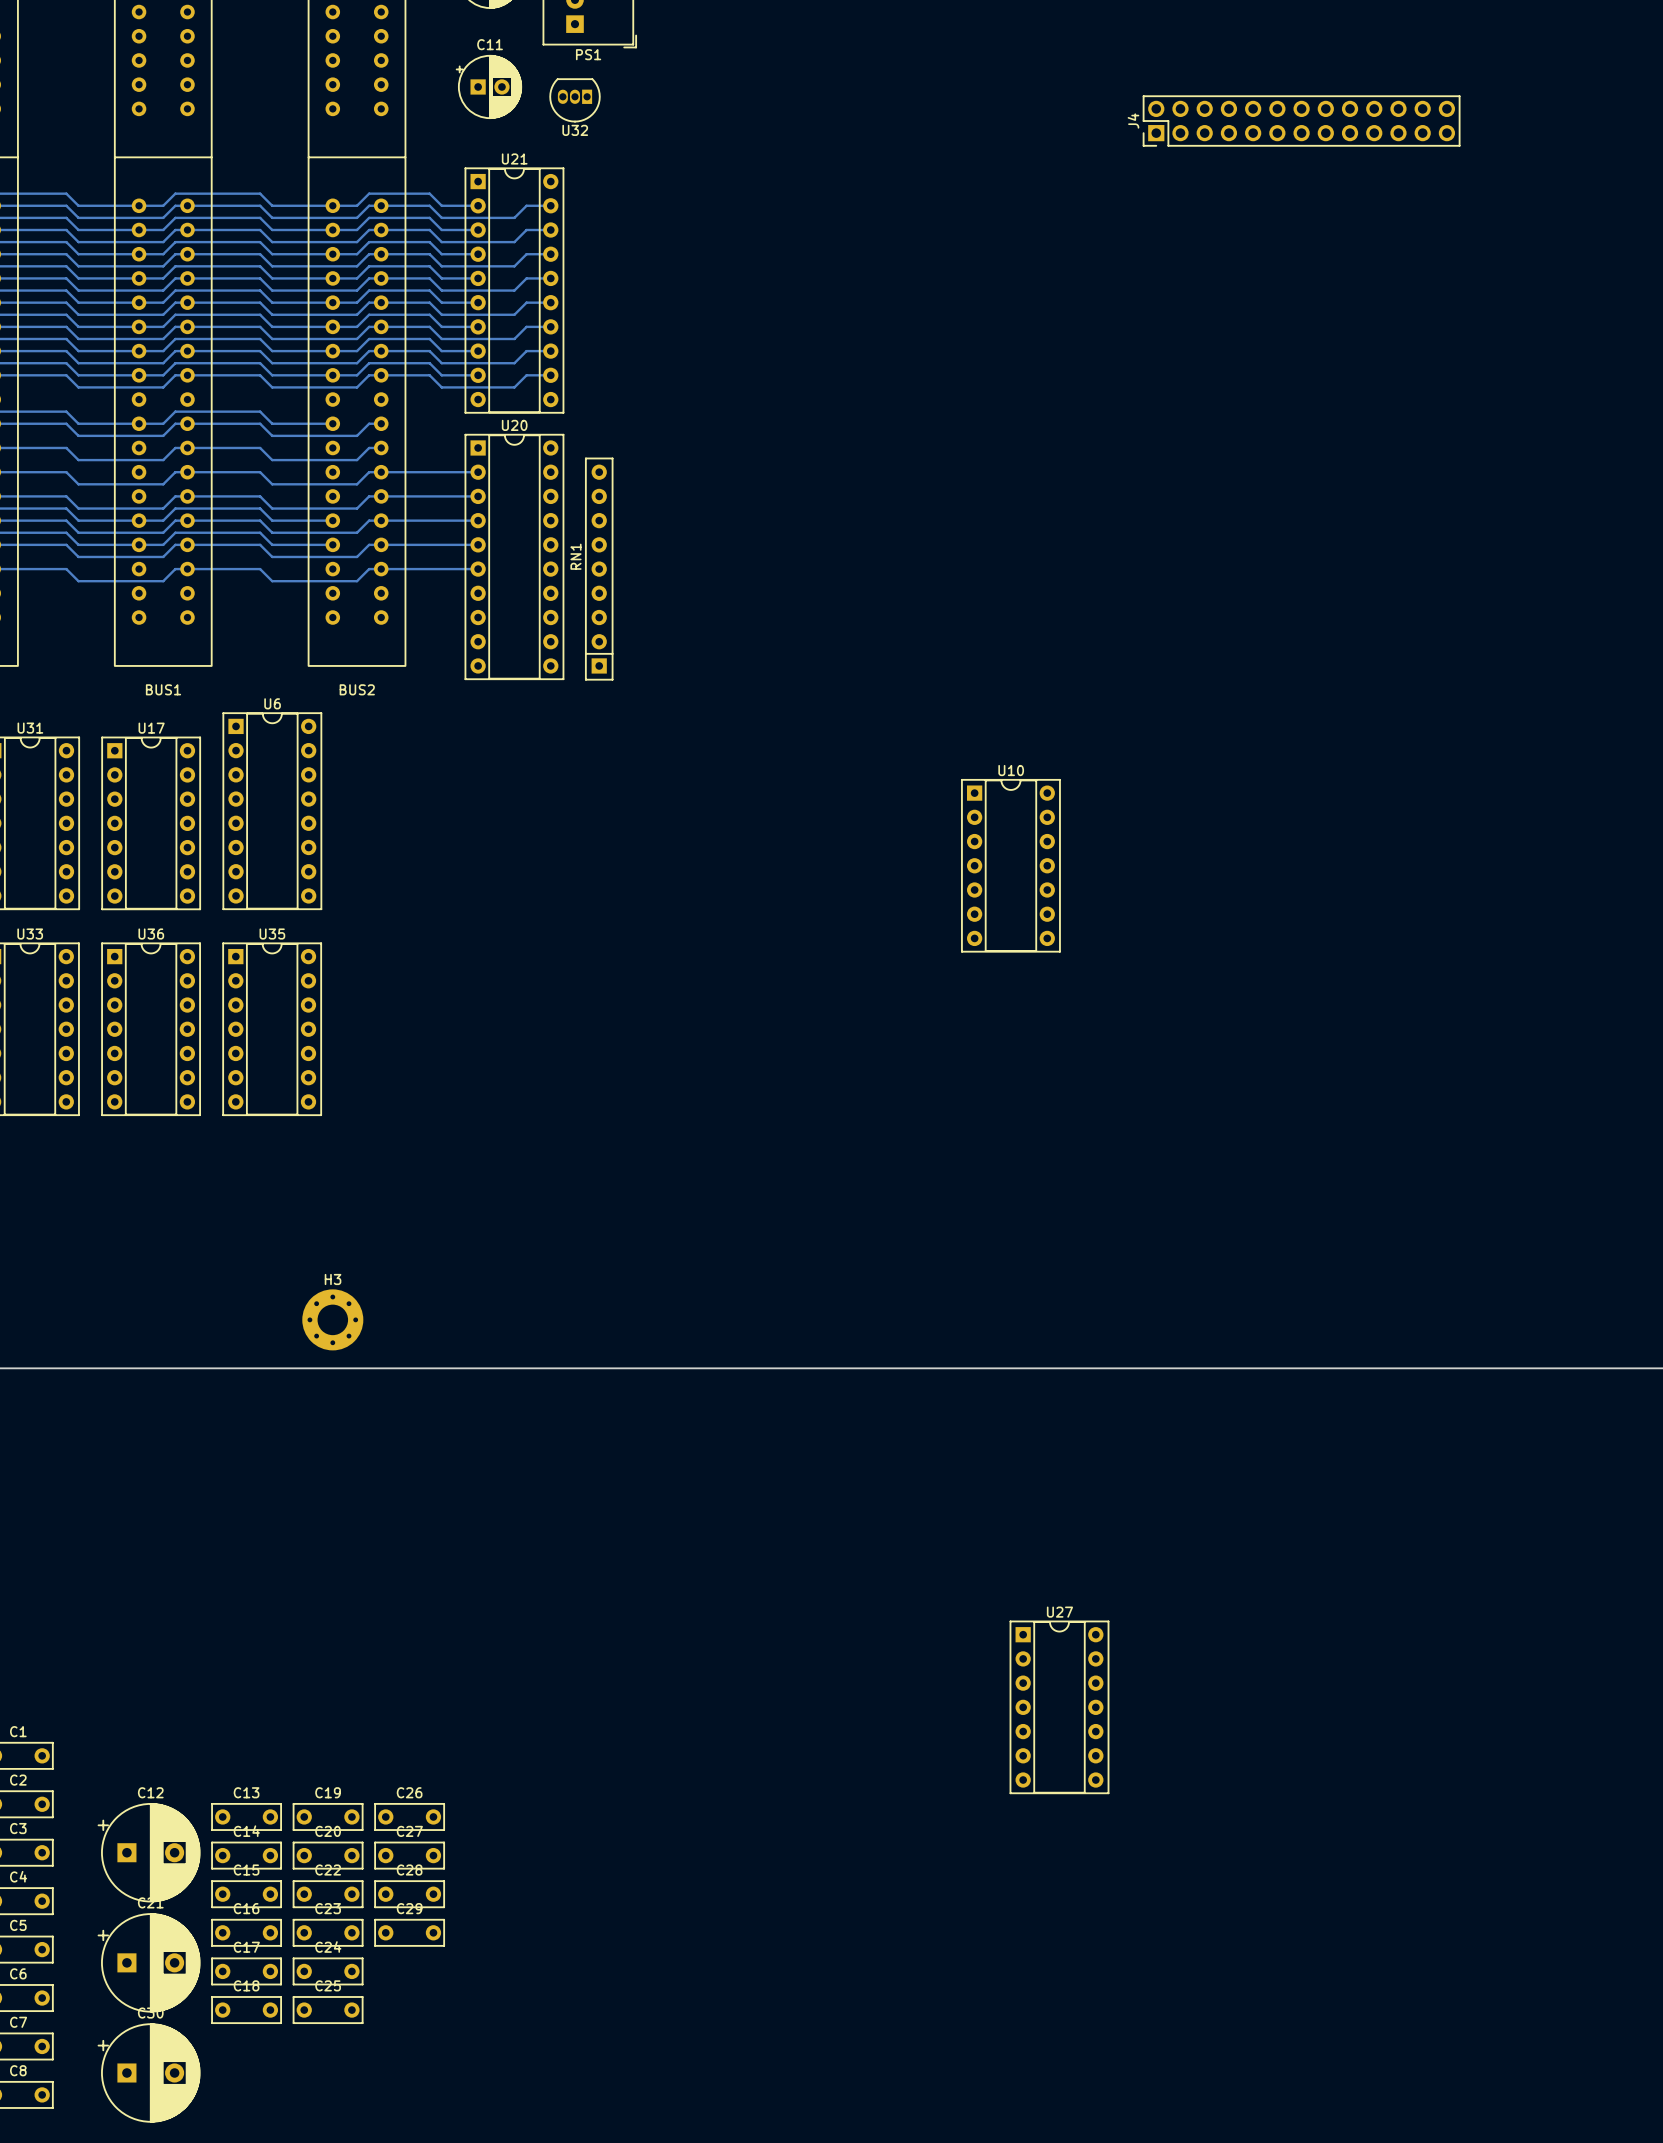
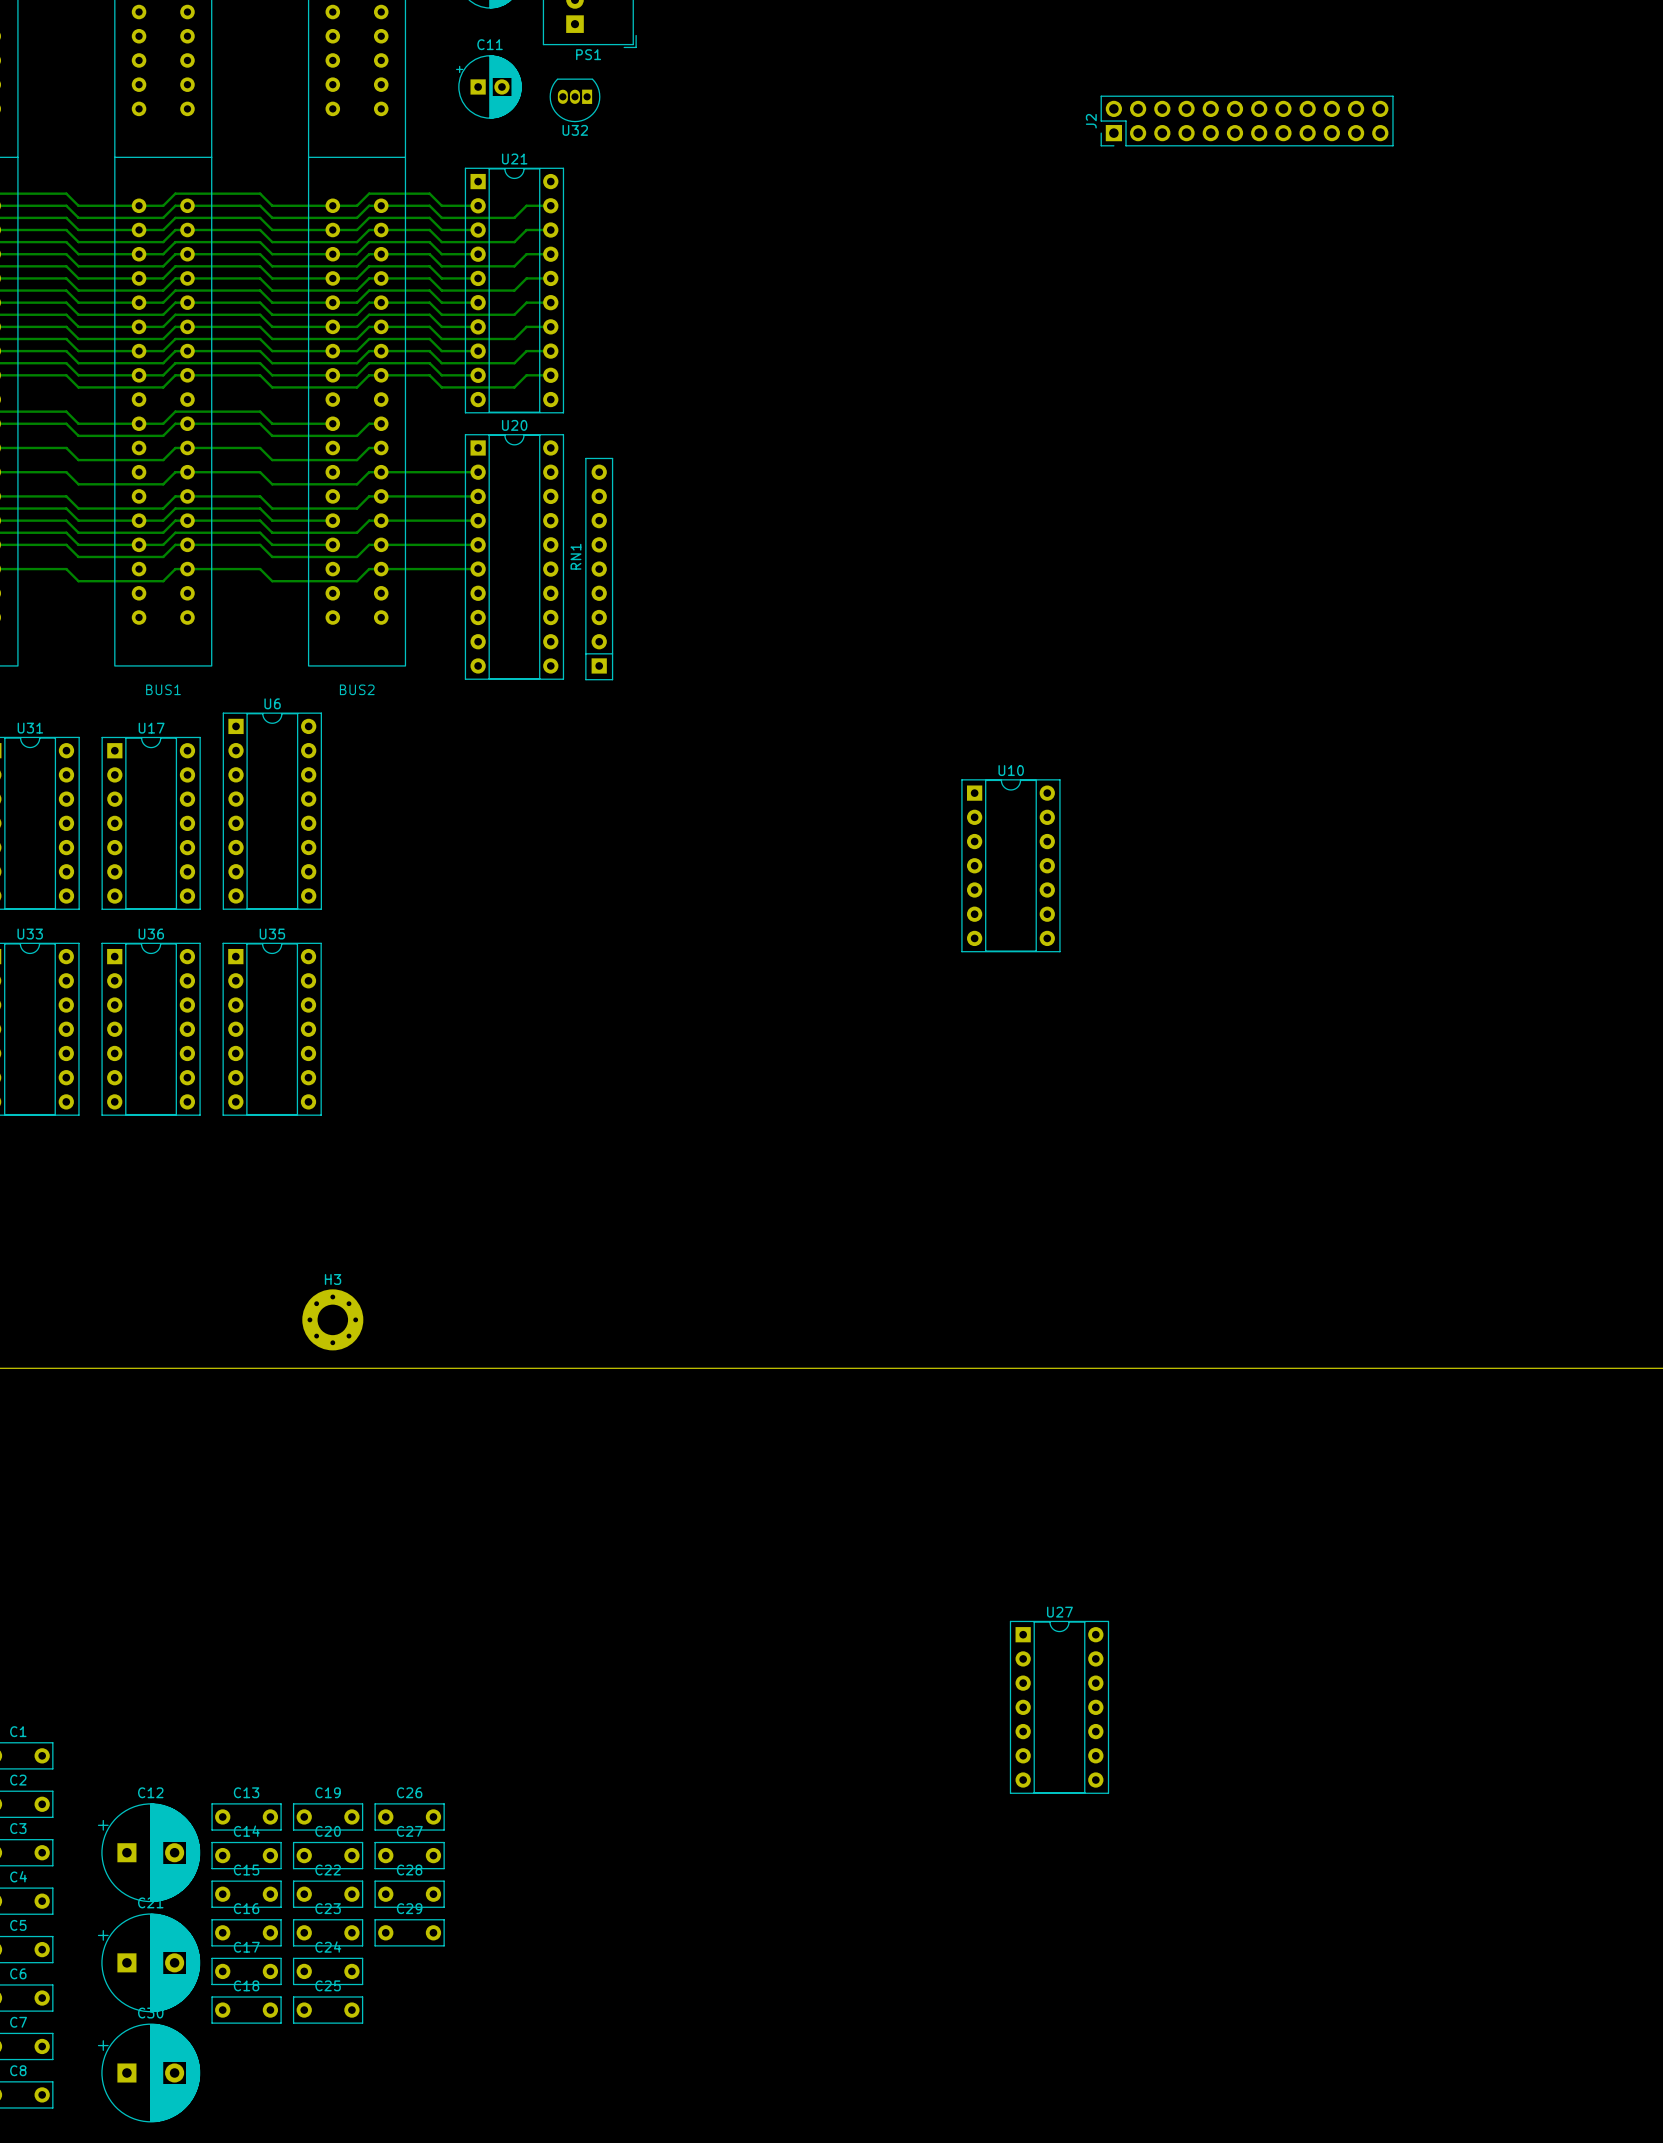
J2: none -> (1247, 121)
J4: (1301, 121) -> none

